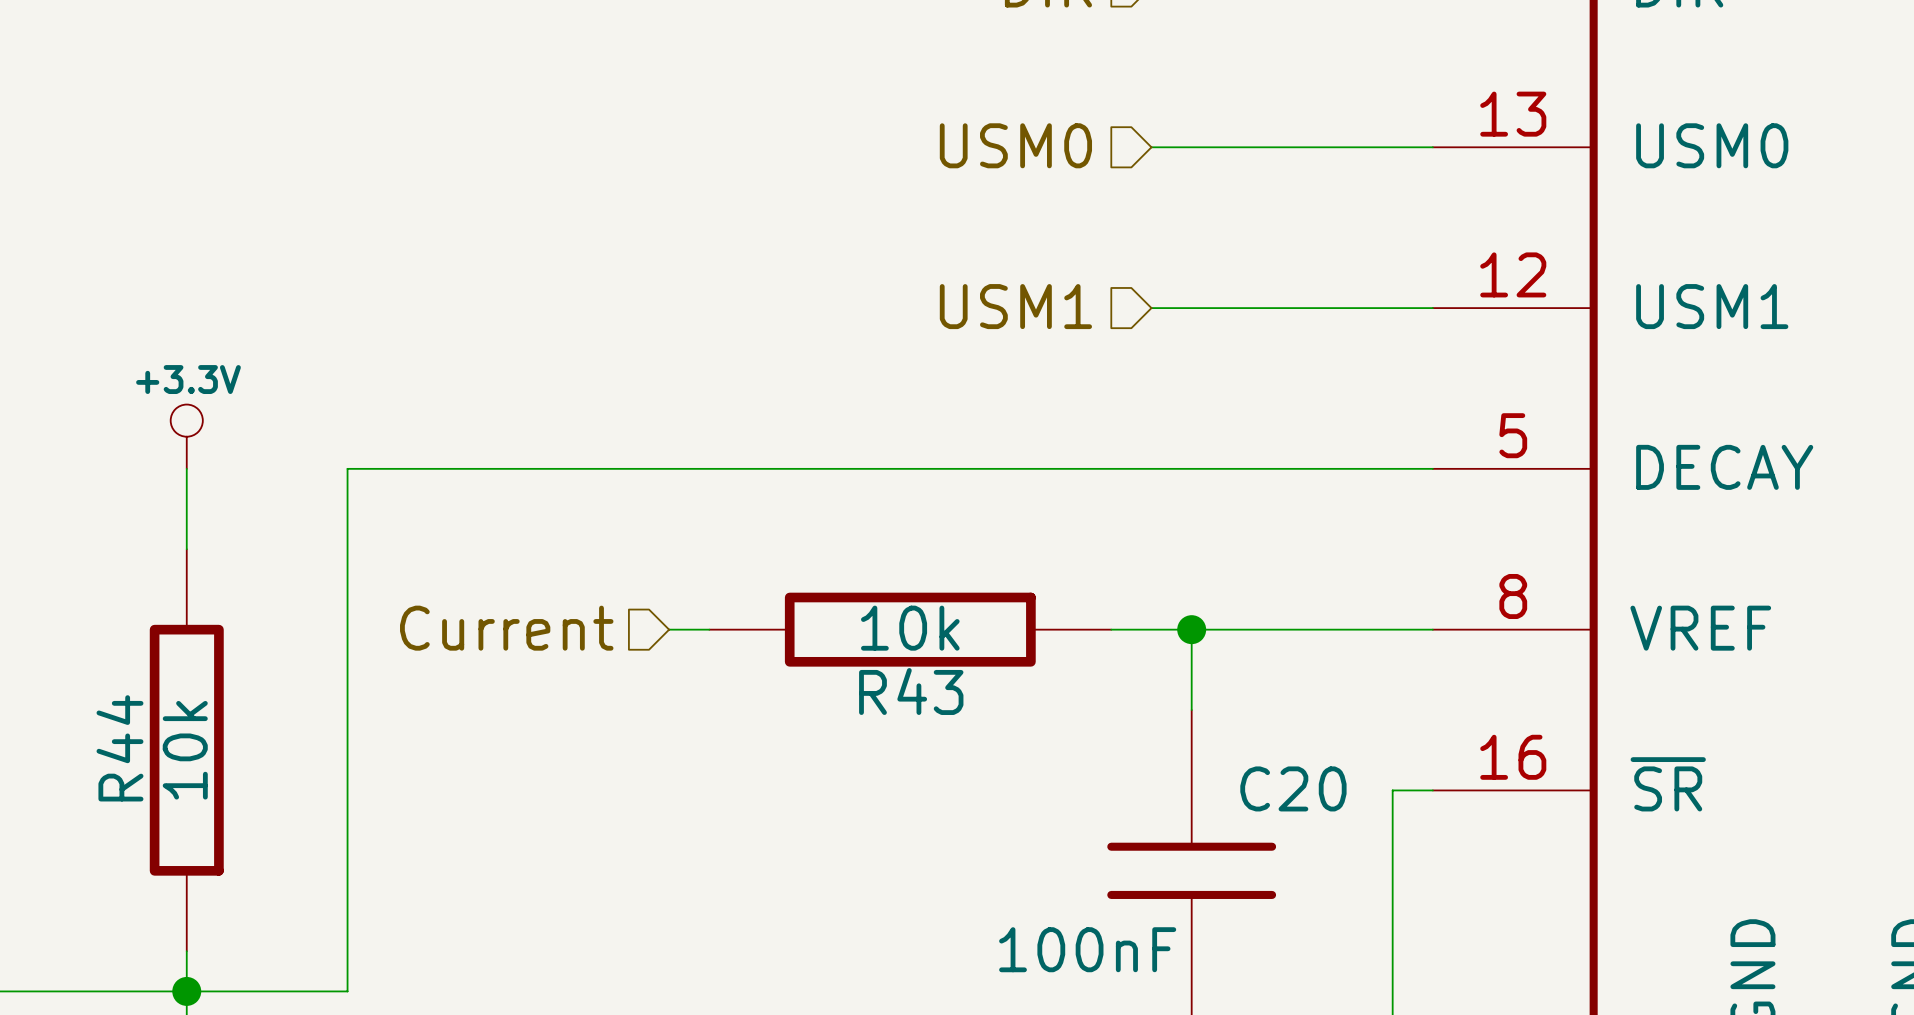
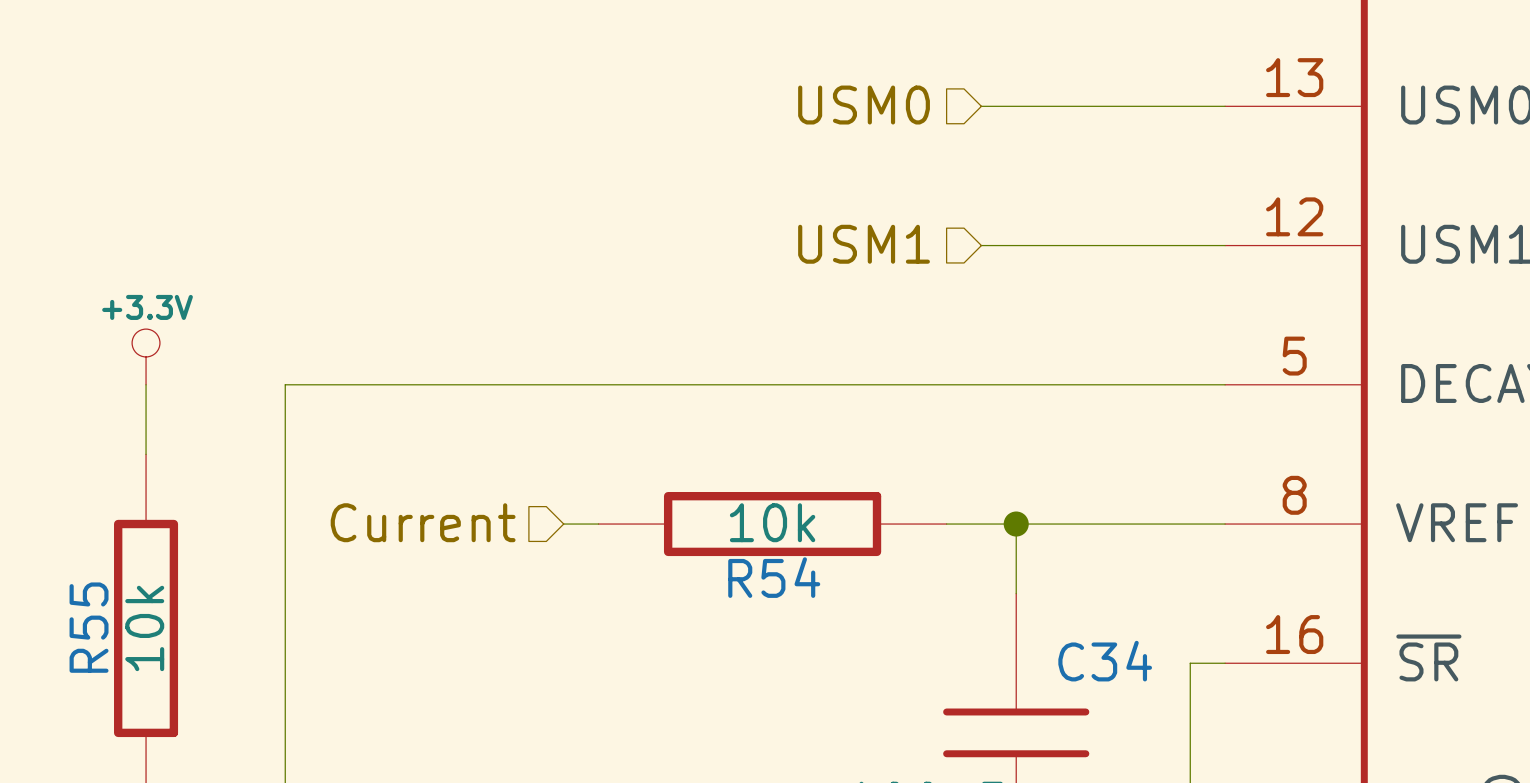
R43 name: R43 (911, 691) -> R54 (774, 577)
R44 name: R44 (119, 748) -> R55 (89, 627)
C20 name: C20 (1293, 788) -> C34 (1105, 661)

